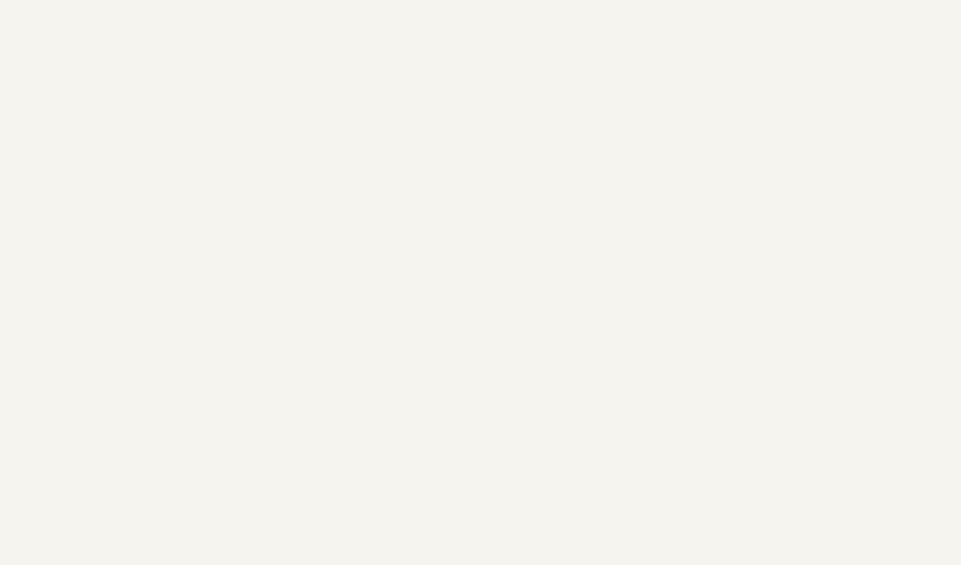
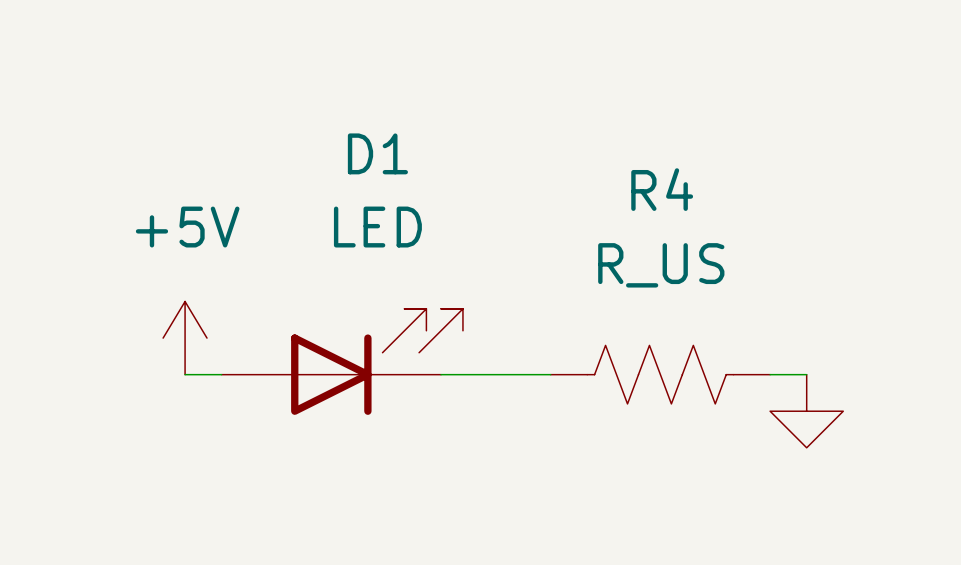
power symbol: none -> +5V (185, 338)
D1: none -> LED (342, 361)
wire: none -> (185, 374) (221, 374)
wire: none -> (441, 374) (550, 374)
R4: none -> R_US (660, 374)
wire: none -> (770, 374) (806, 374)
power symbol: none -> (806, 411)

